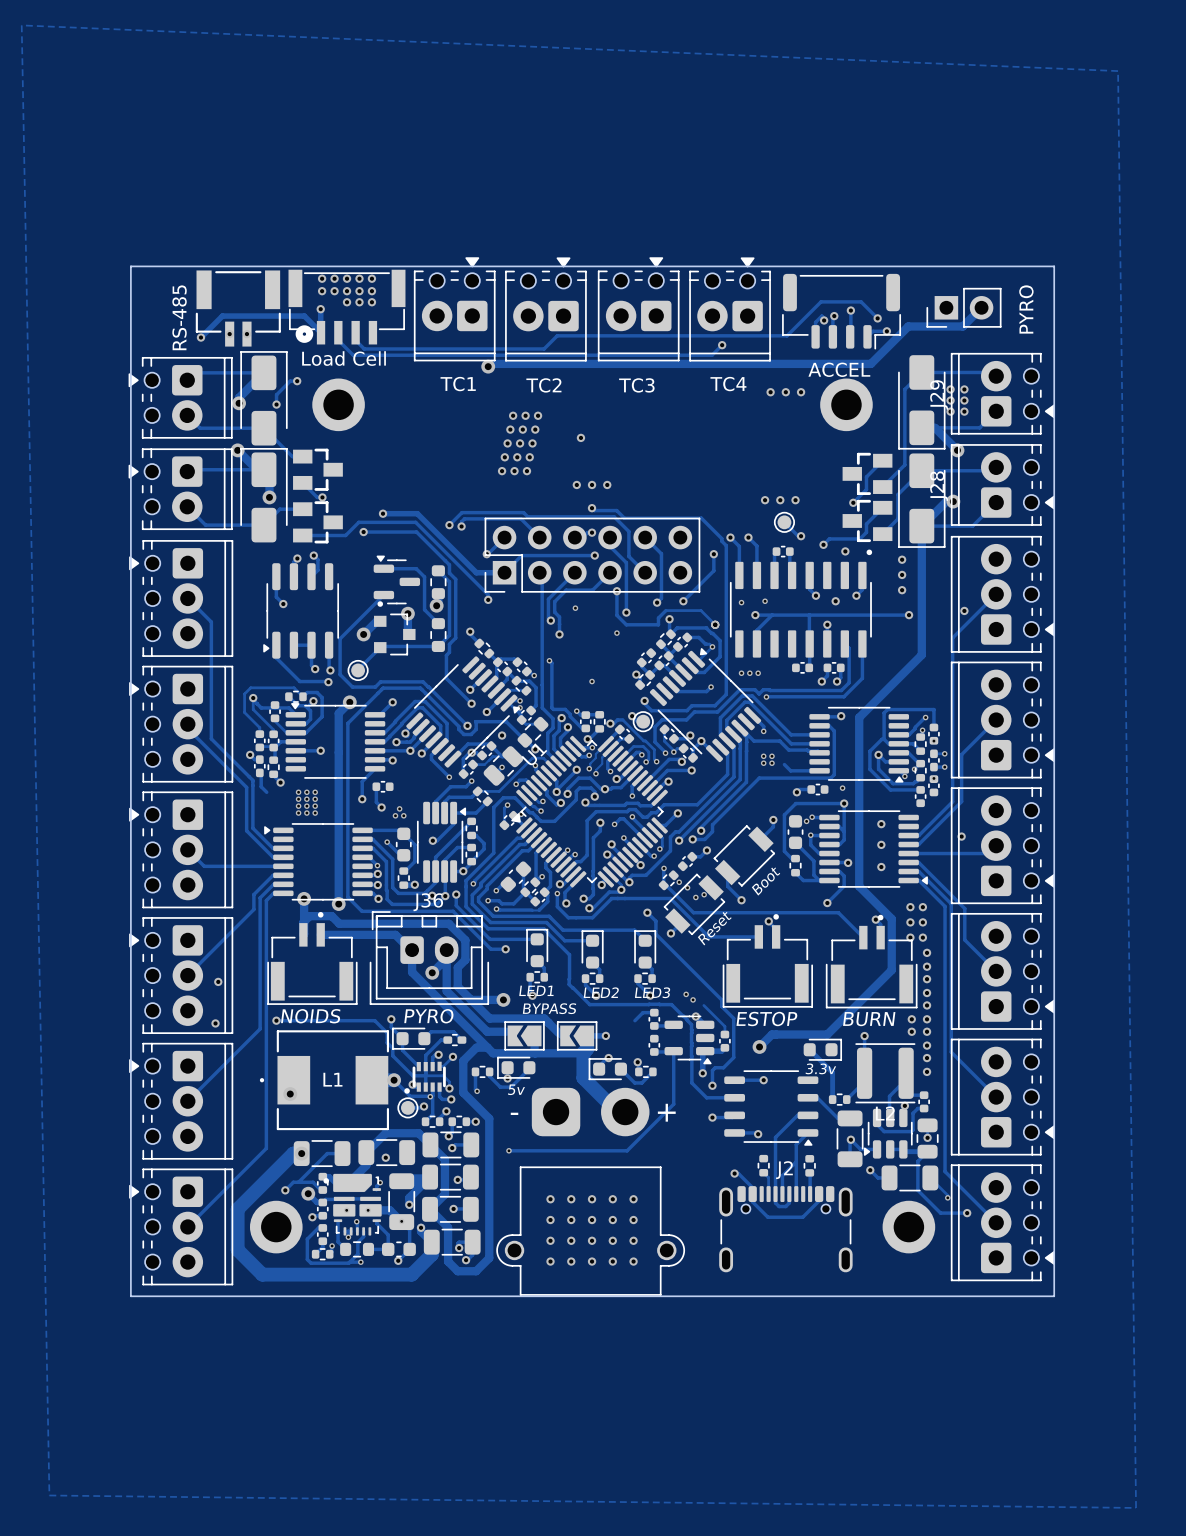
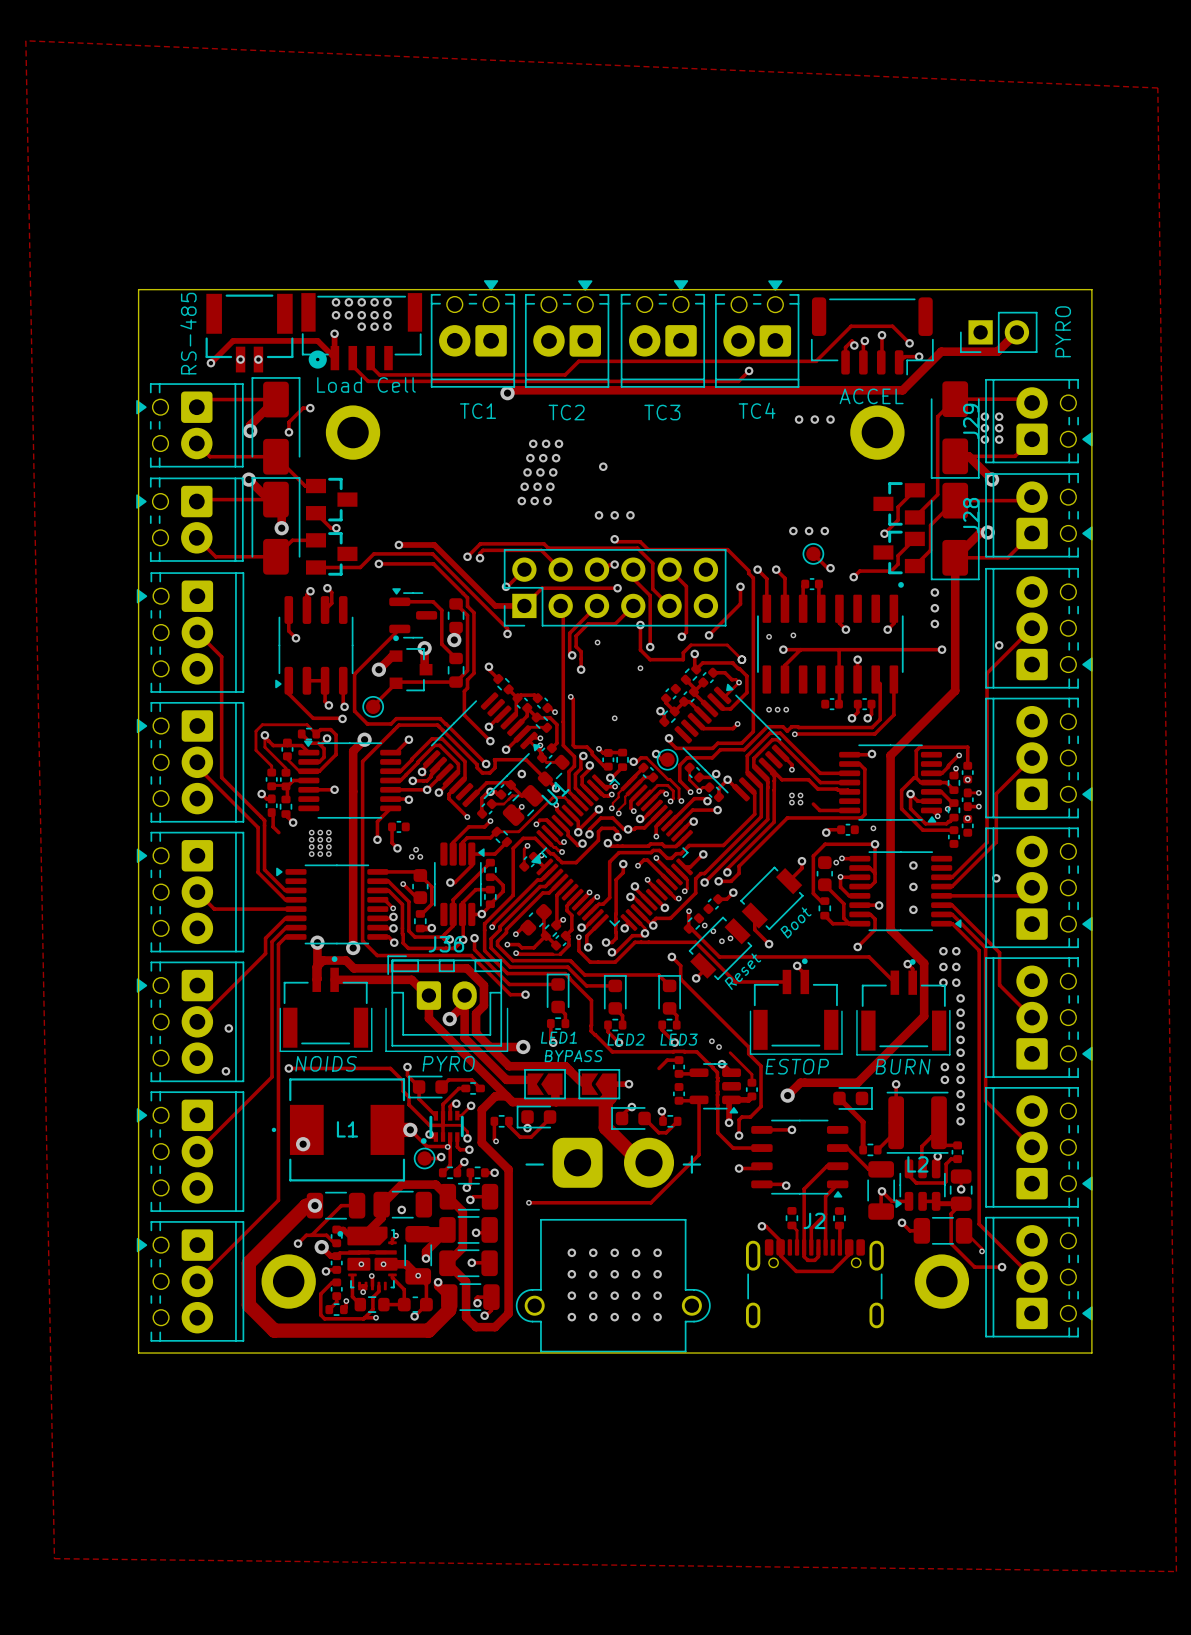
via: (845, 551) -> none
via: (835, 601) -> none
text: 3.3v (820, 1068) -> none
text: 5v (516, 1089) -> none

